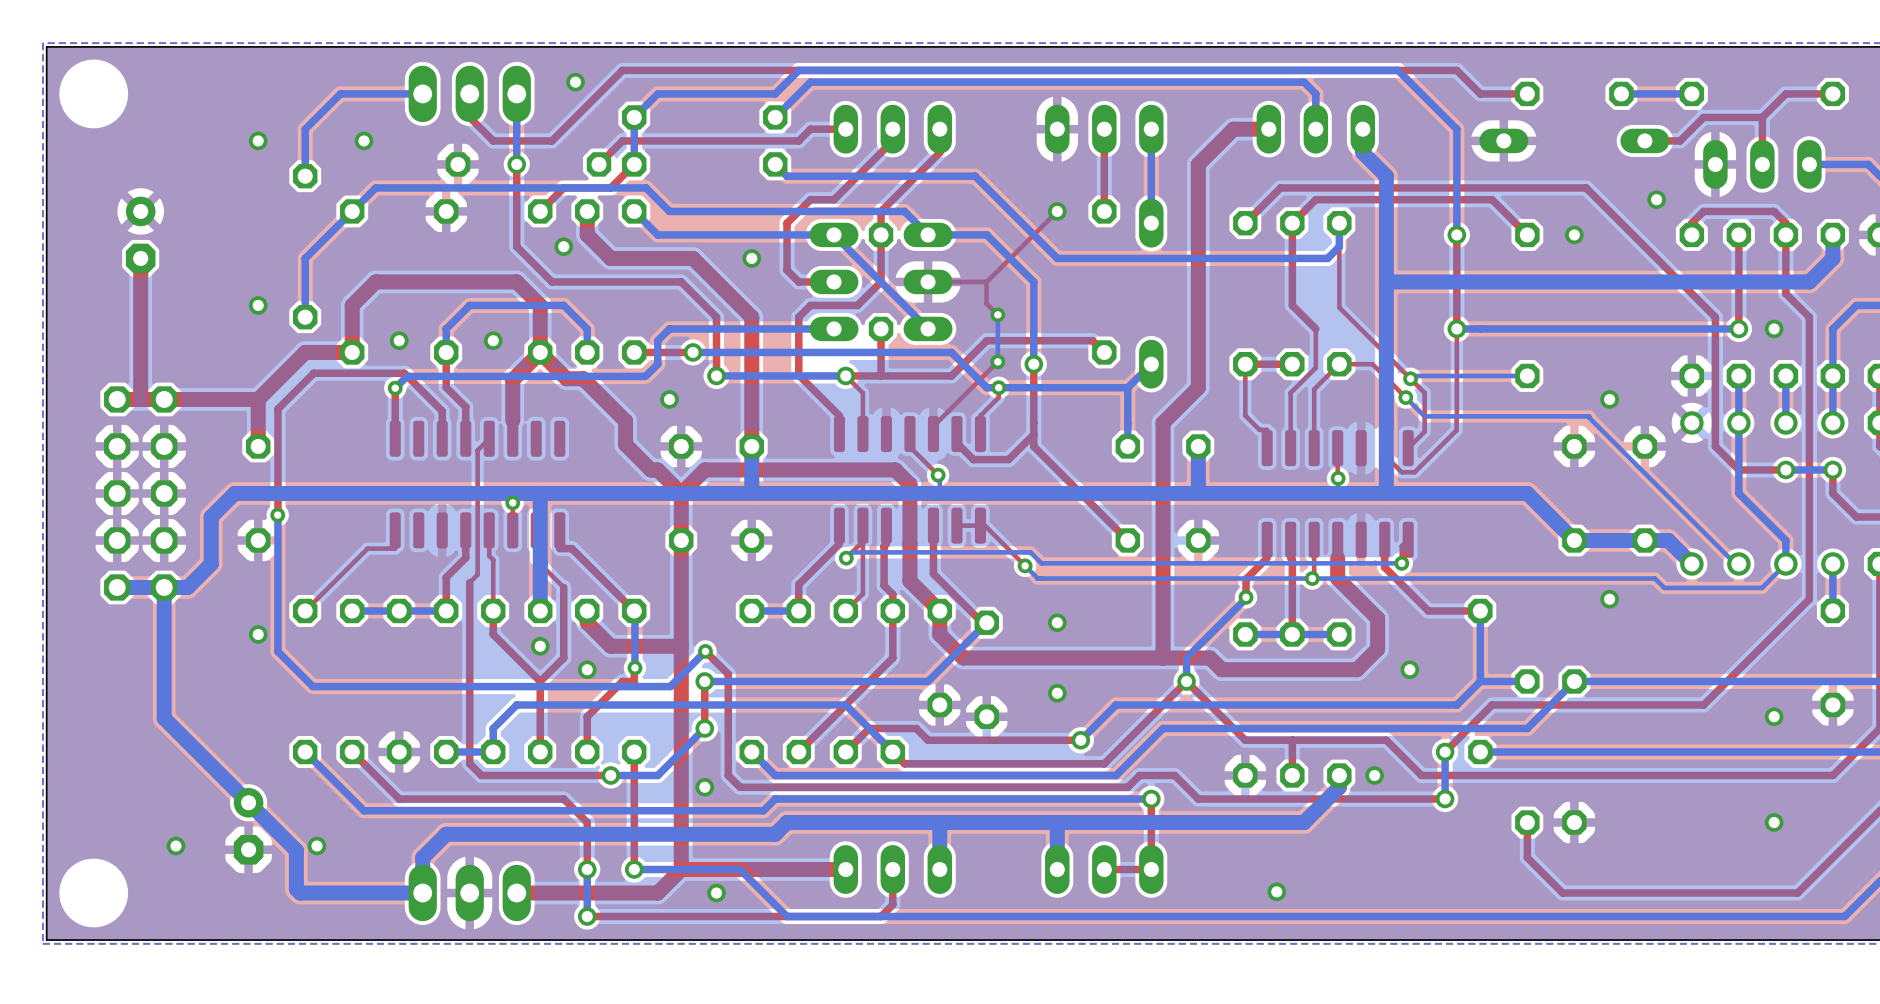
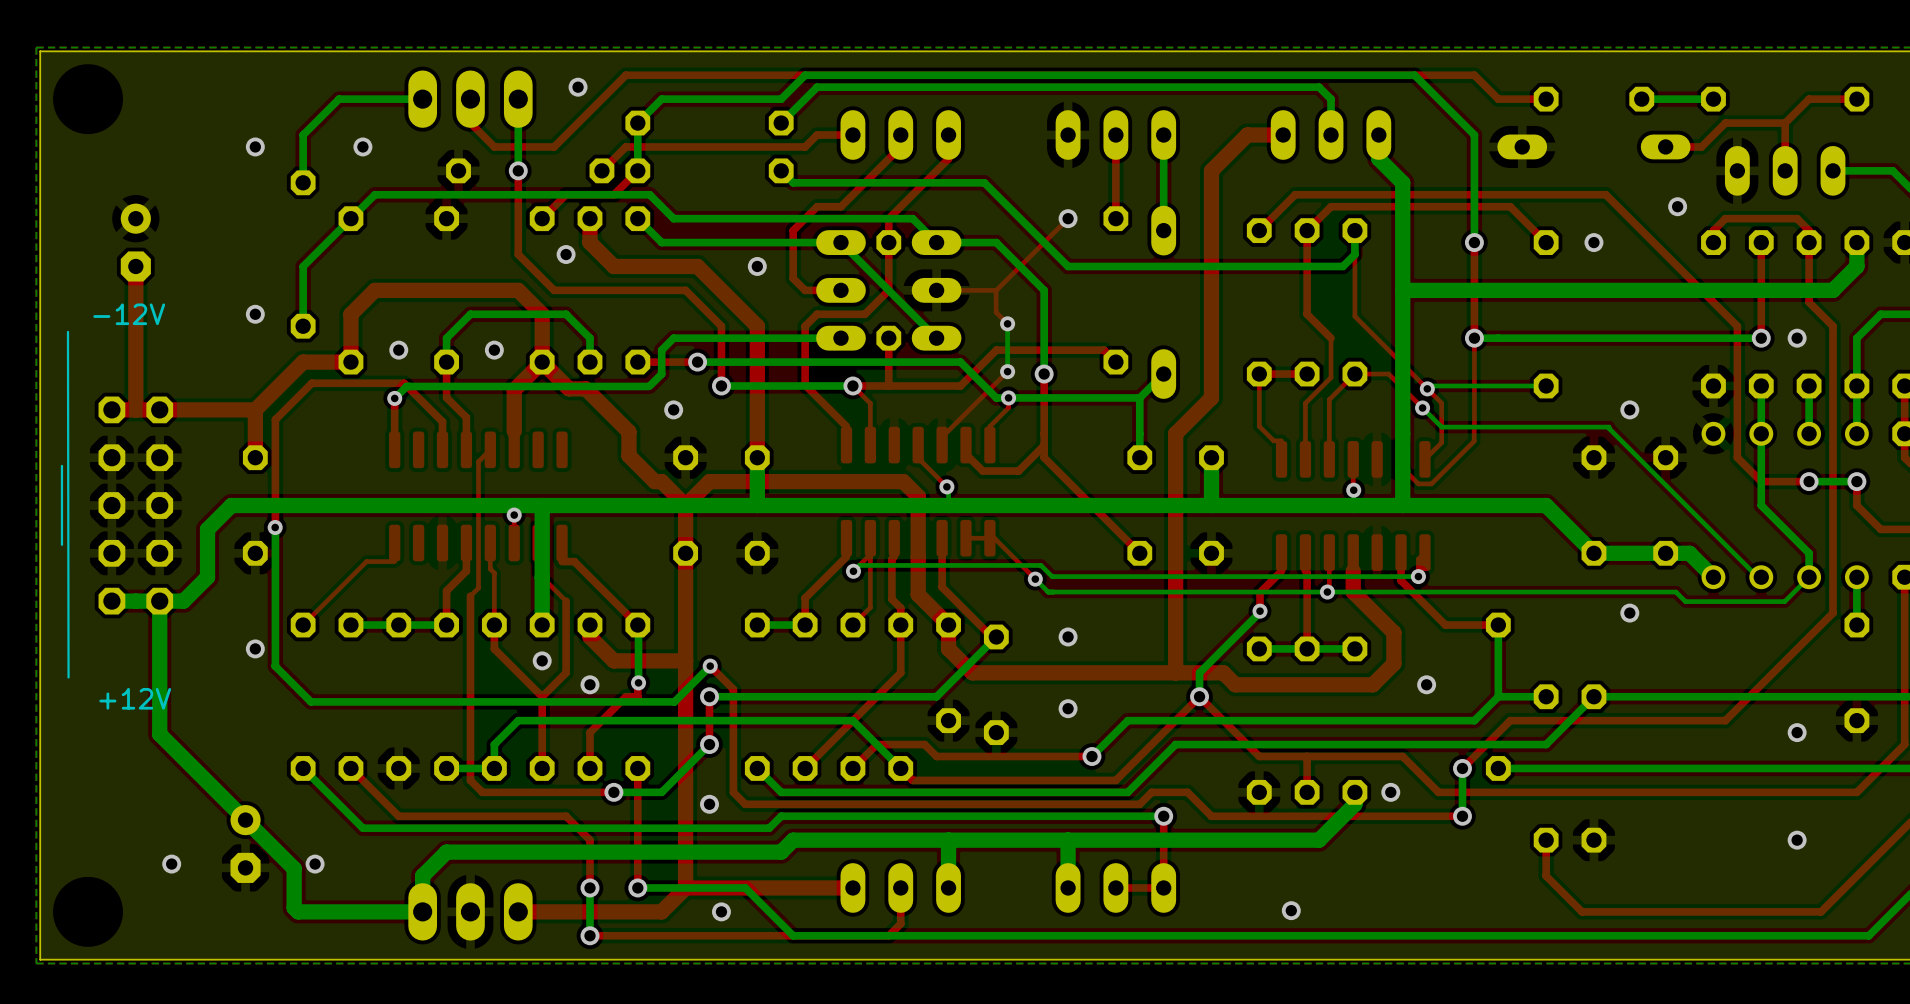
text: none -> -12V (129, 314)
line: none -> (67, 331) (68, 677)
line: none -> (61, 465) (61, 544)
text: none -> +12V (135, 698)

